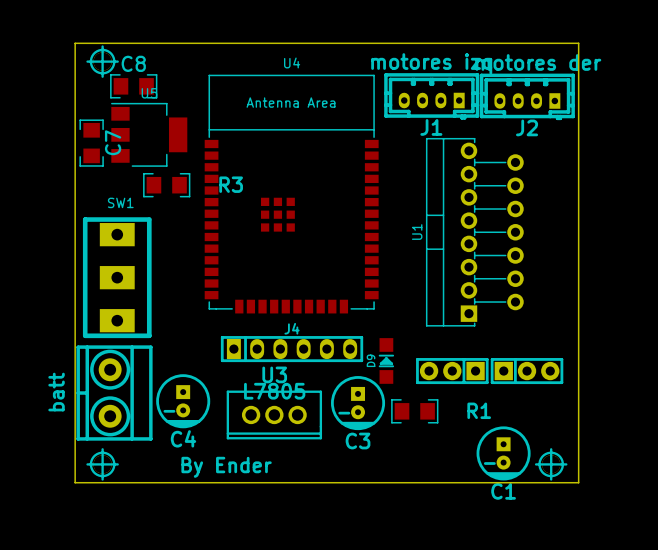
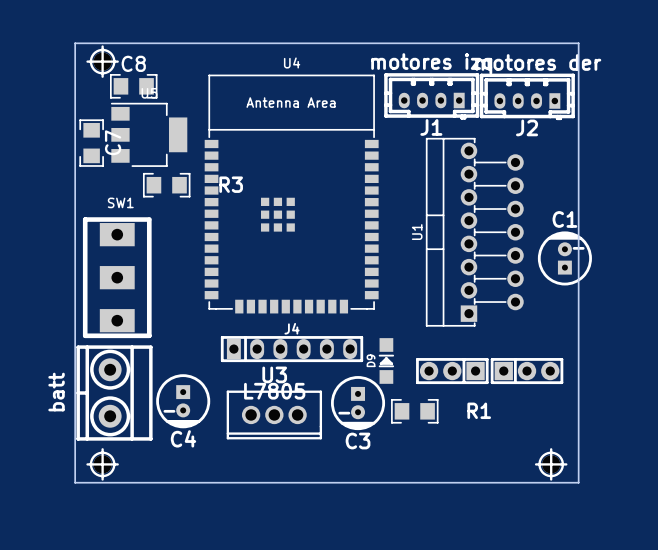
C1 rotation: 0° (503, 453) -> 180° (564, 258)
C1 position: (503, 453) -> (564, 258)
text: By Ender (226, 467) -> none

